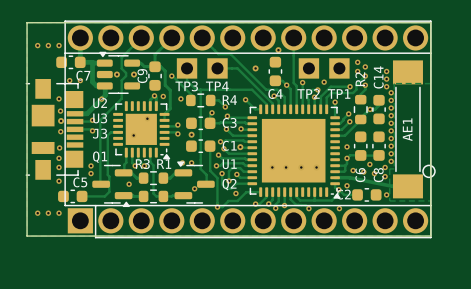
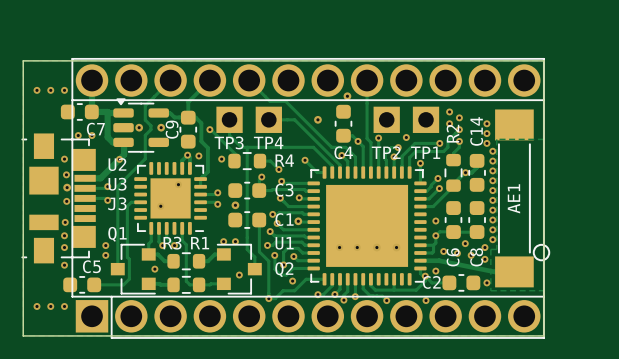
U3 footprint: [113, 101, 171, 160] -> [134, 162, 207, 235]
U1 footprint: [247, 104, 341, 199] -> [307, 166, 427, 286]
Q2 footprint: [174, 161, 215, 204] -> [216, 243, 262, 295]
Q1 footprint: [92, 164, 133, 208] -> [110, 243, 156, 295]

